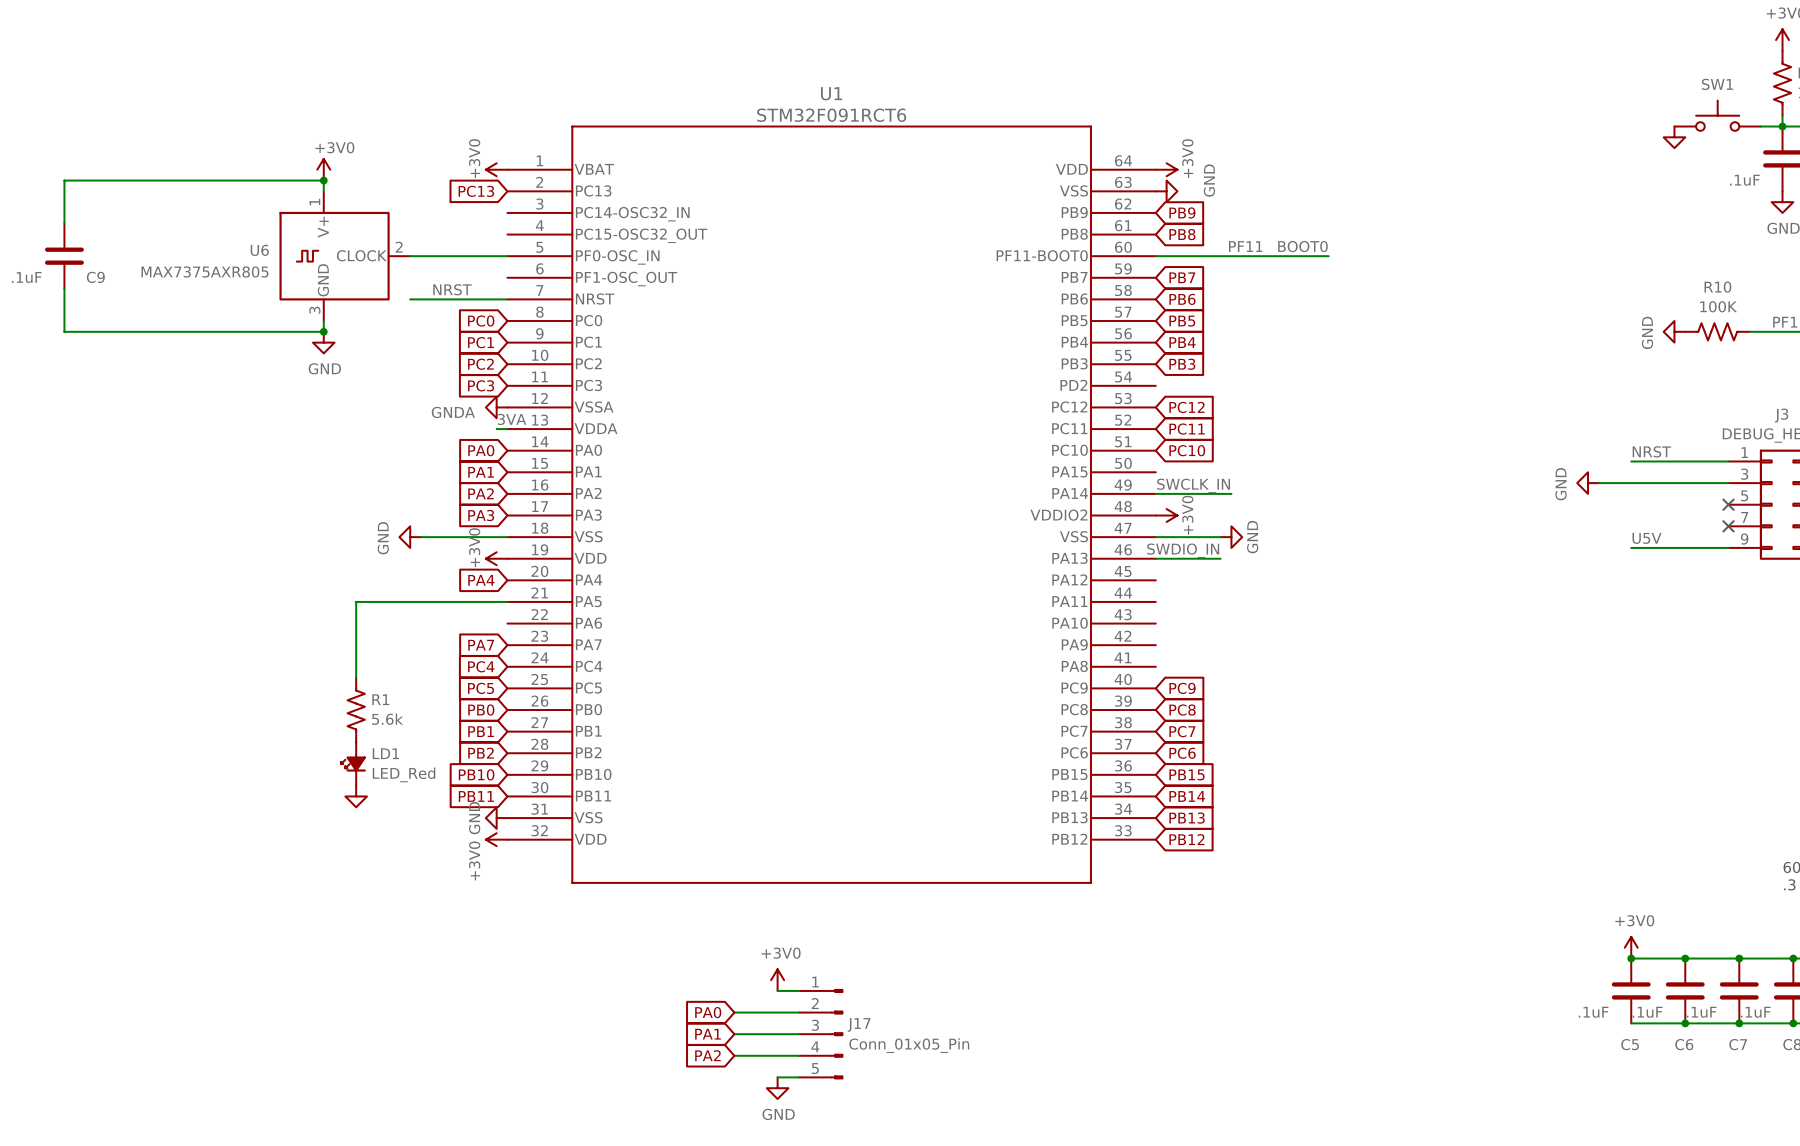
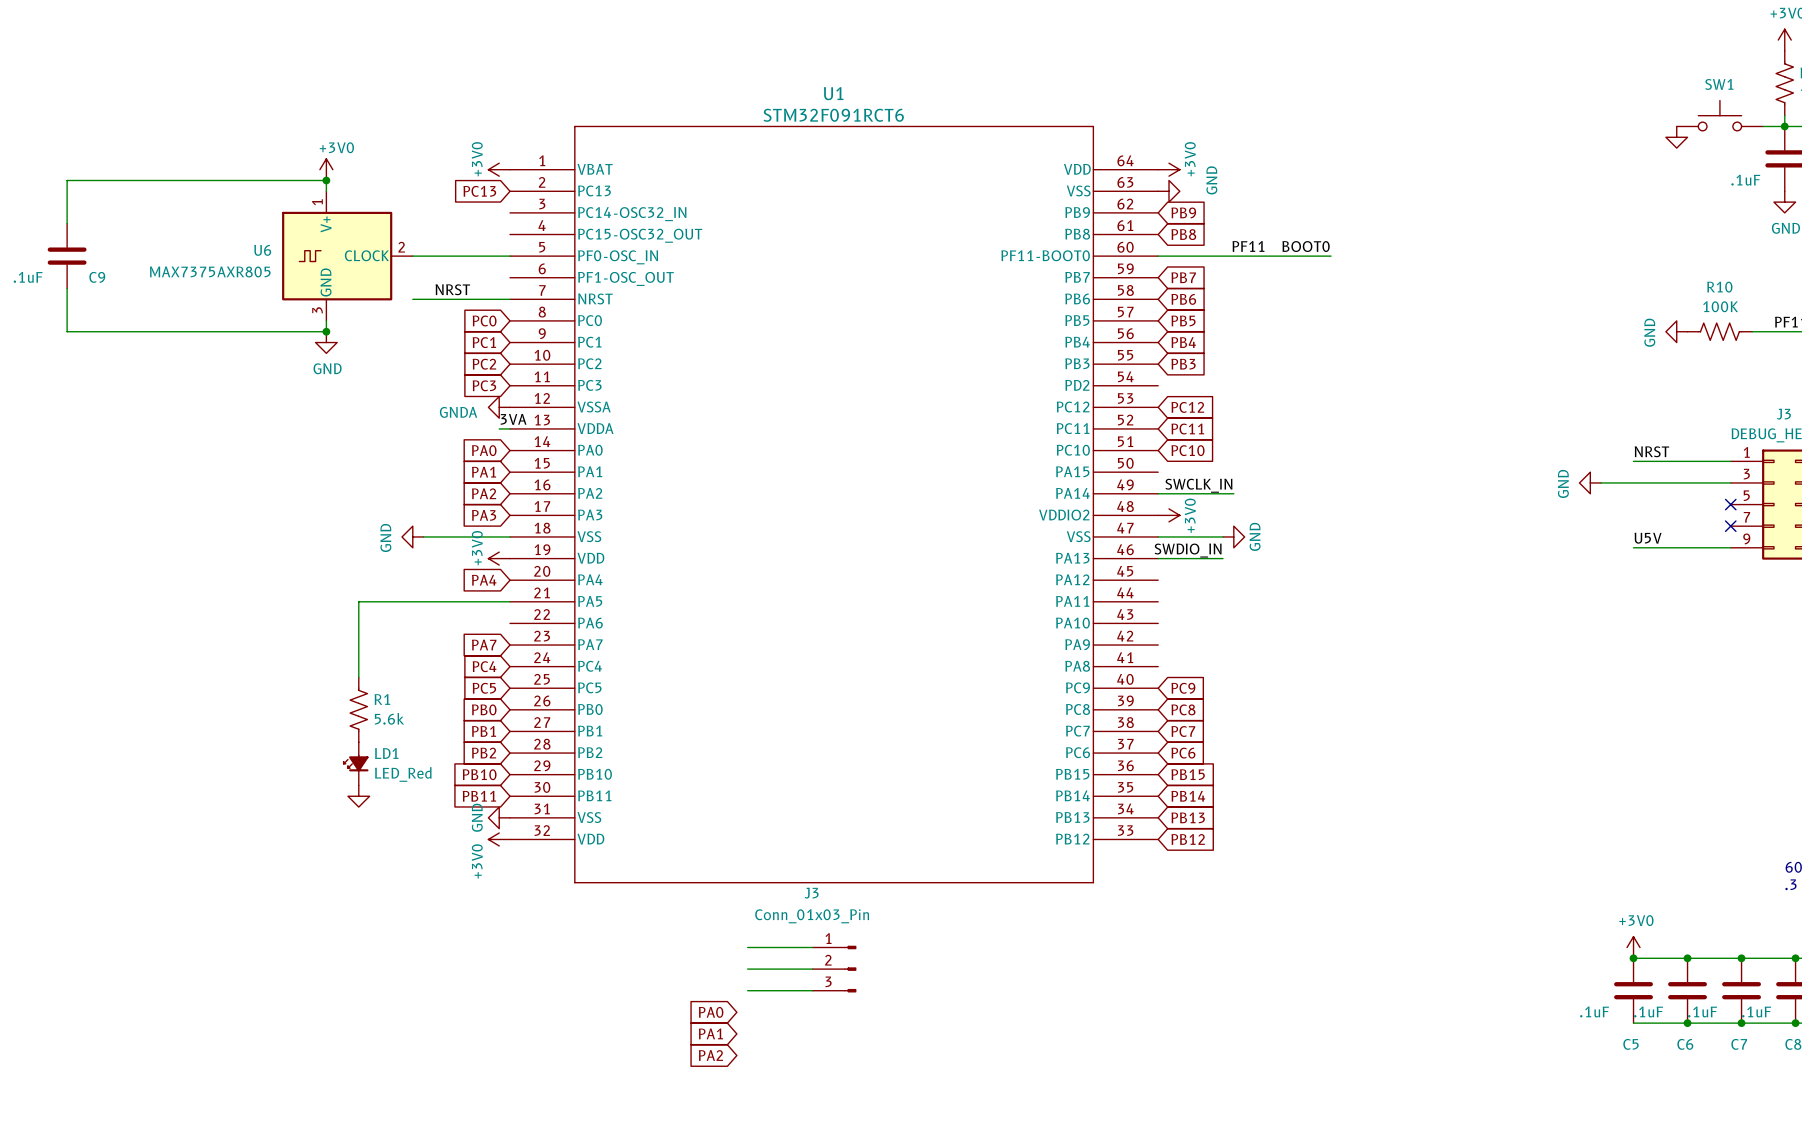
J3: none -> Conn_01x03_Pin (834, 969)
power symbol: +3V0 (777, 980) -> none
wire: none -> (747, 990) (780, 990)
wire: (734, 1012) (799, 1012) -> (747, 947) (812, 947)
wire: (734, 1034) (799, 1034) -> (747, 969) (812, 969)
J17: Conn_01x05_Pin (821, 1034) -> none
wire: (734, 1055) (799, 1055) -> none
wire: (777, 1077) (799, 1077) -> none
power symbol: GND (777, 1088) -> none

